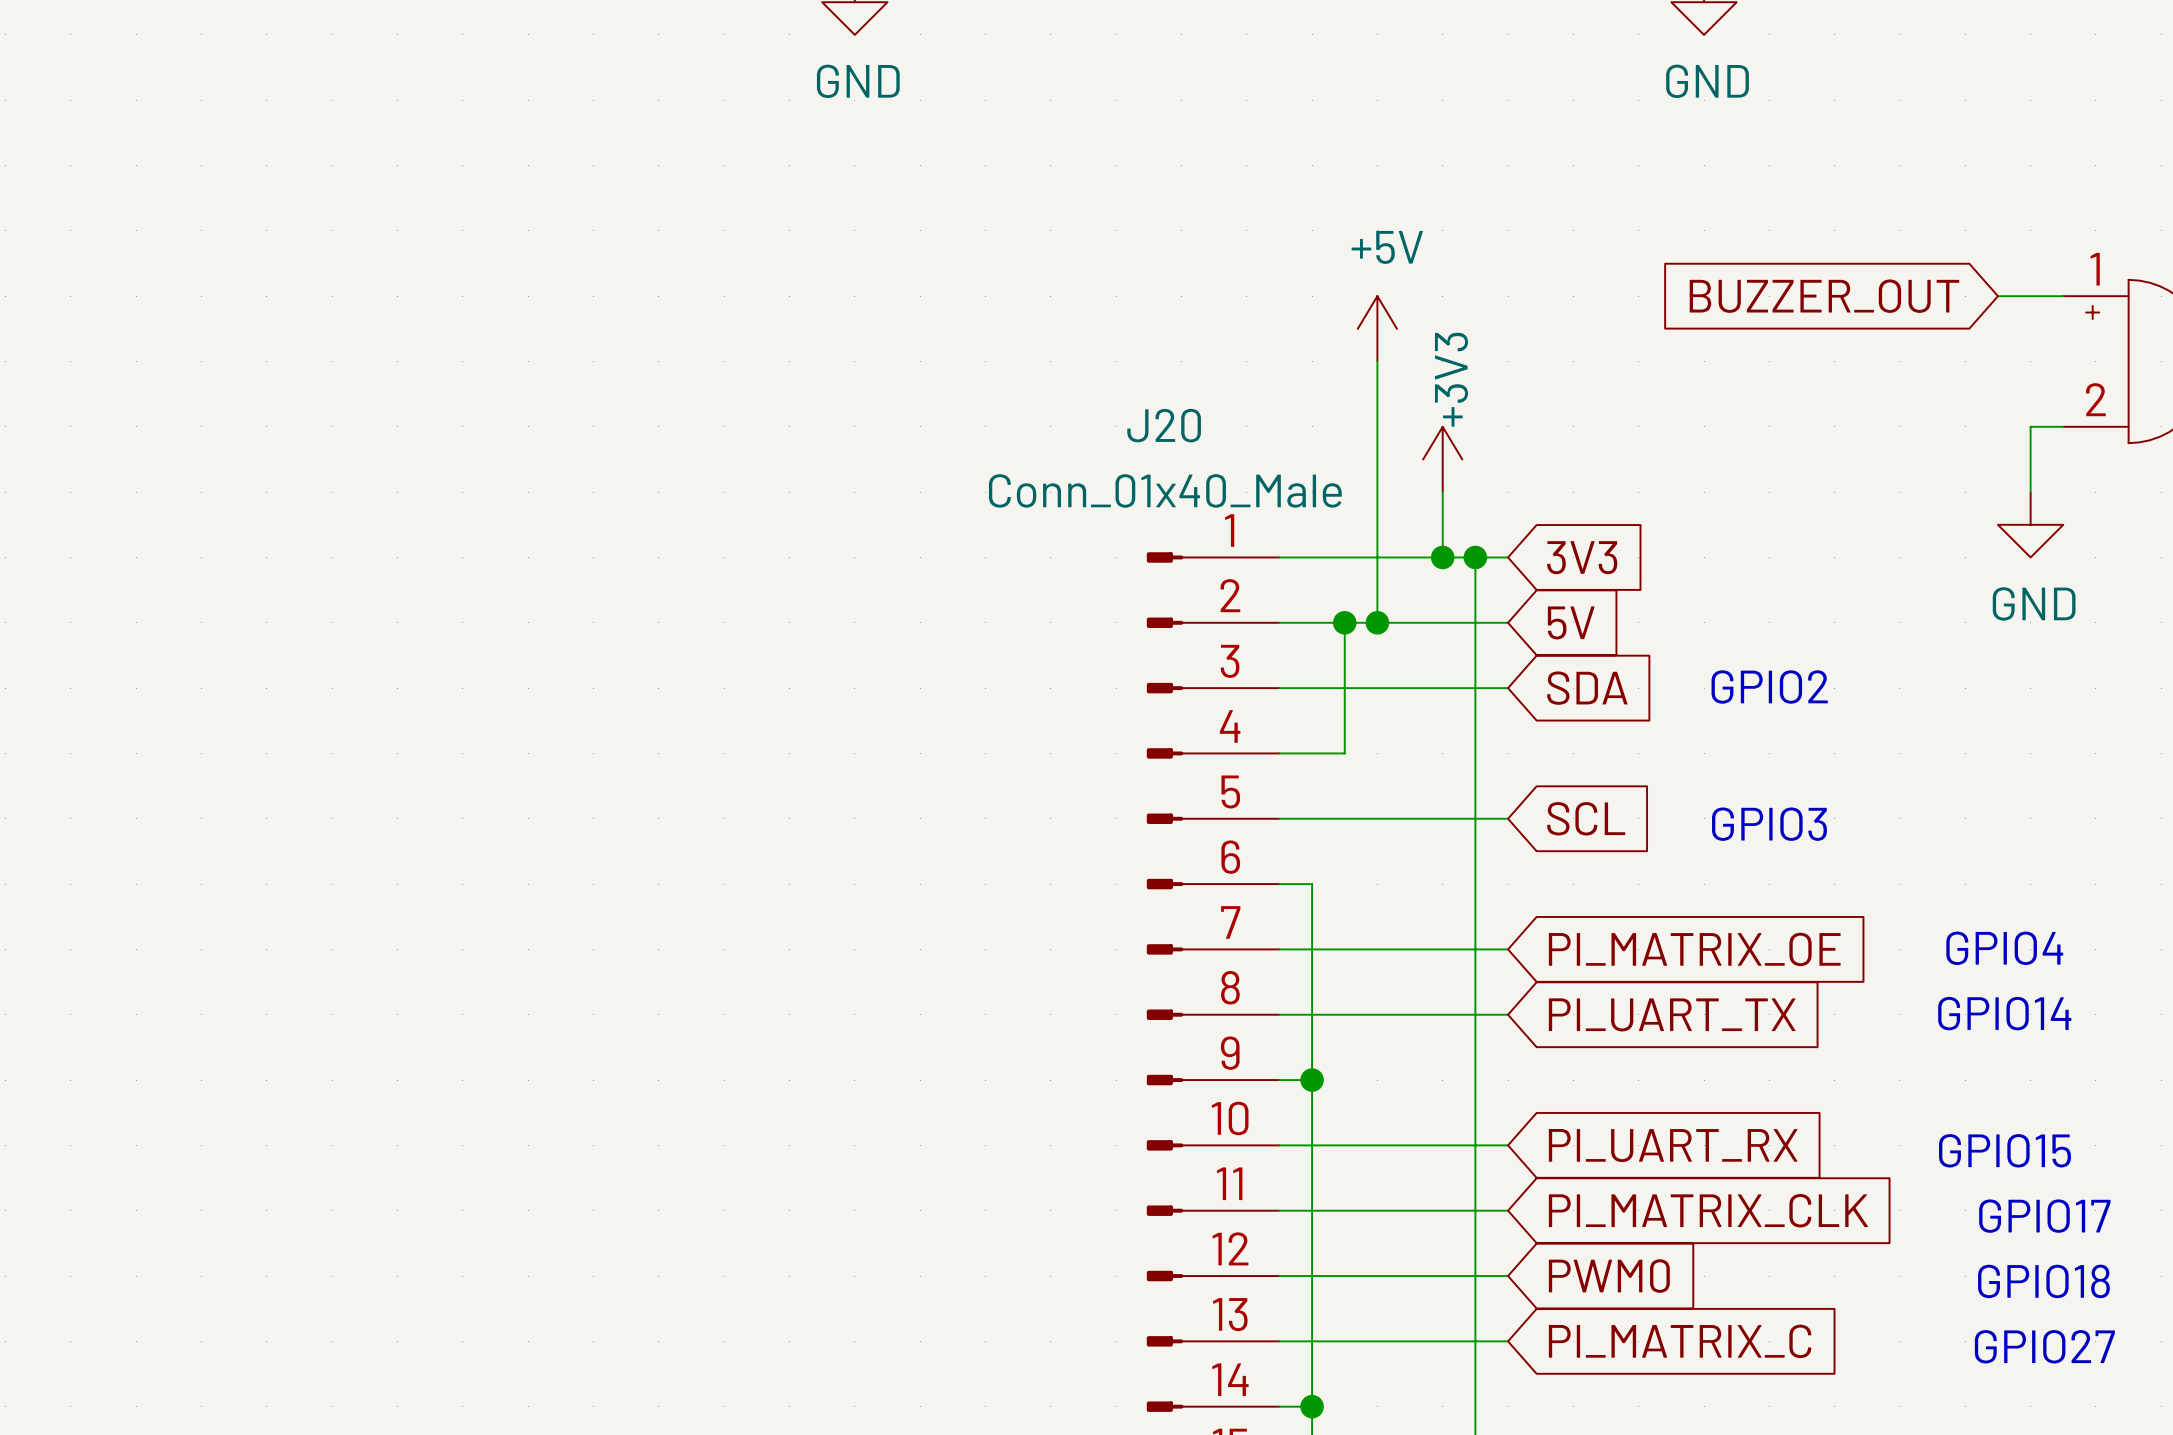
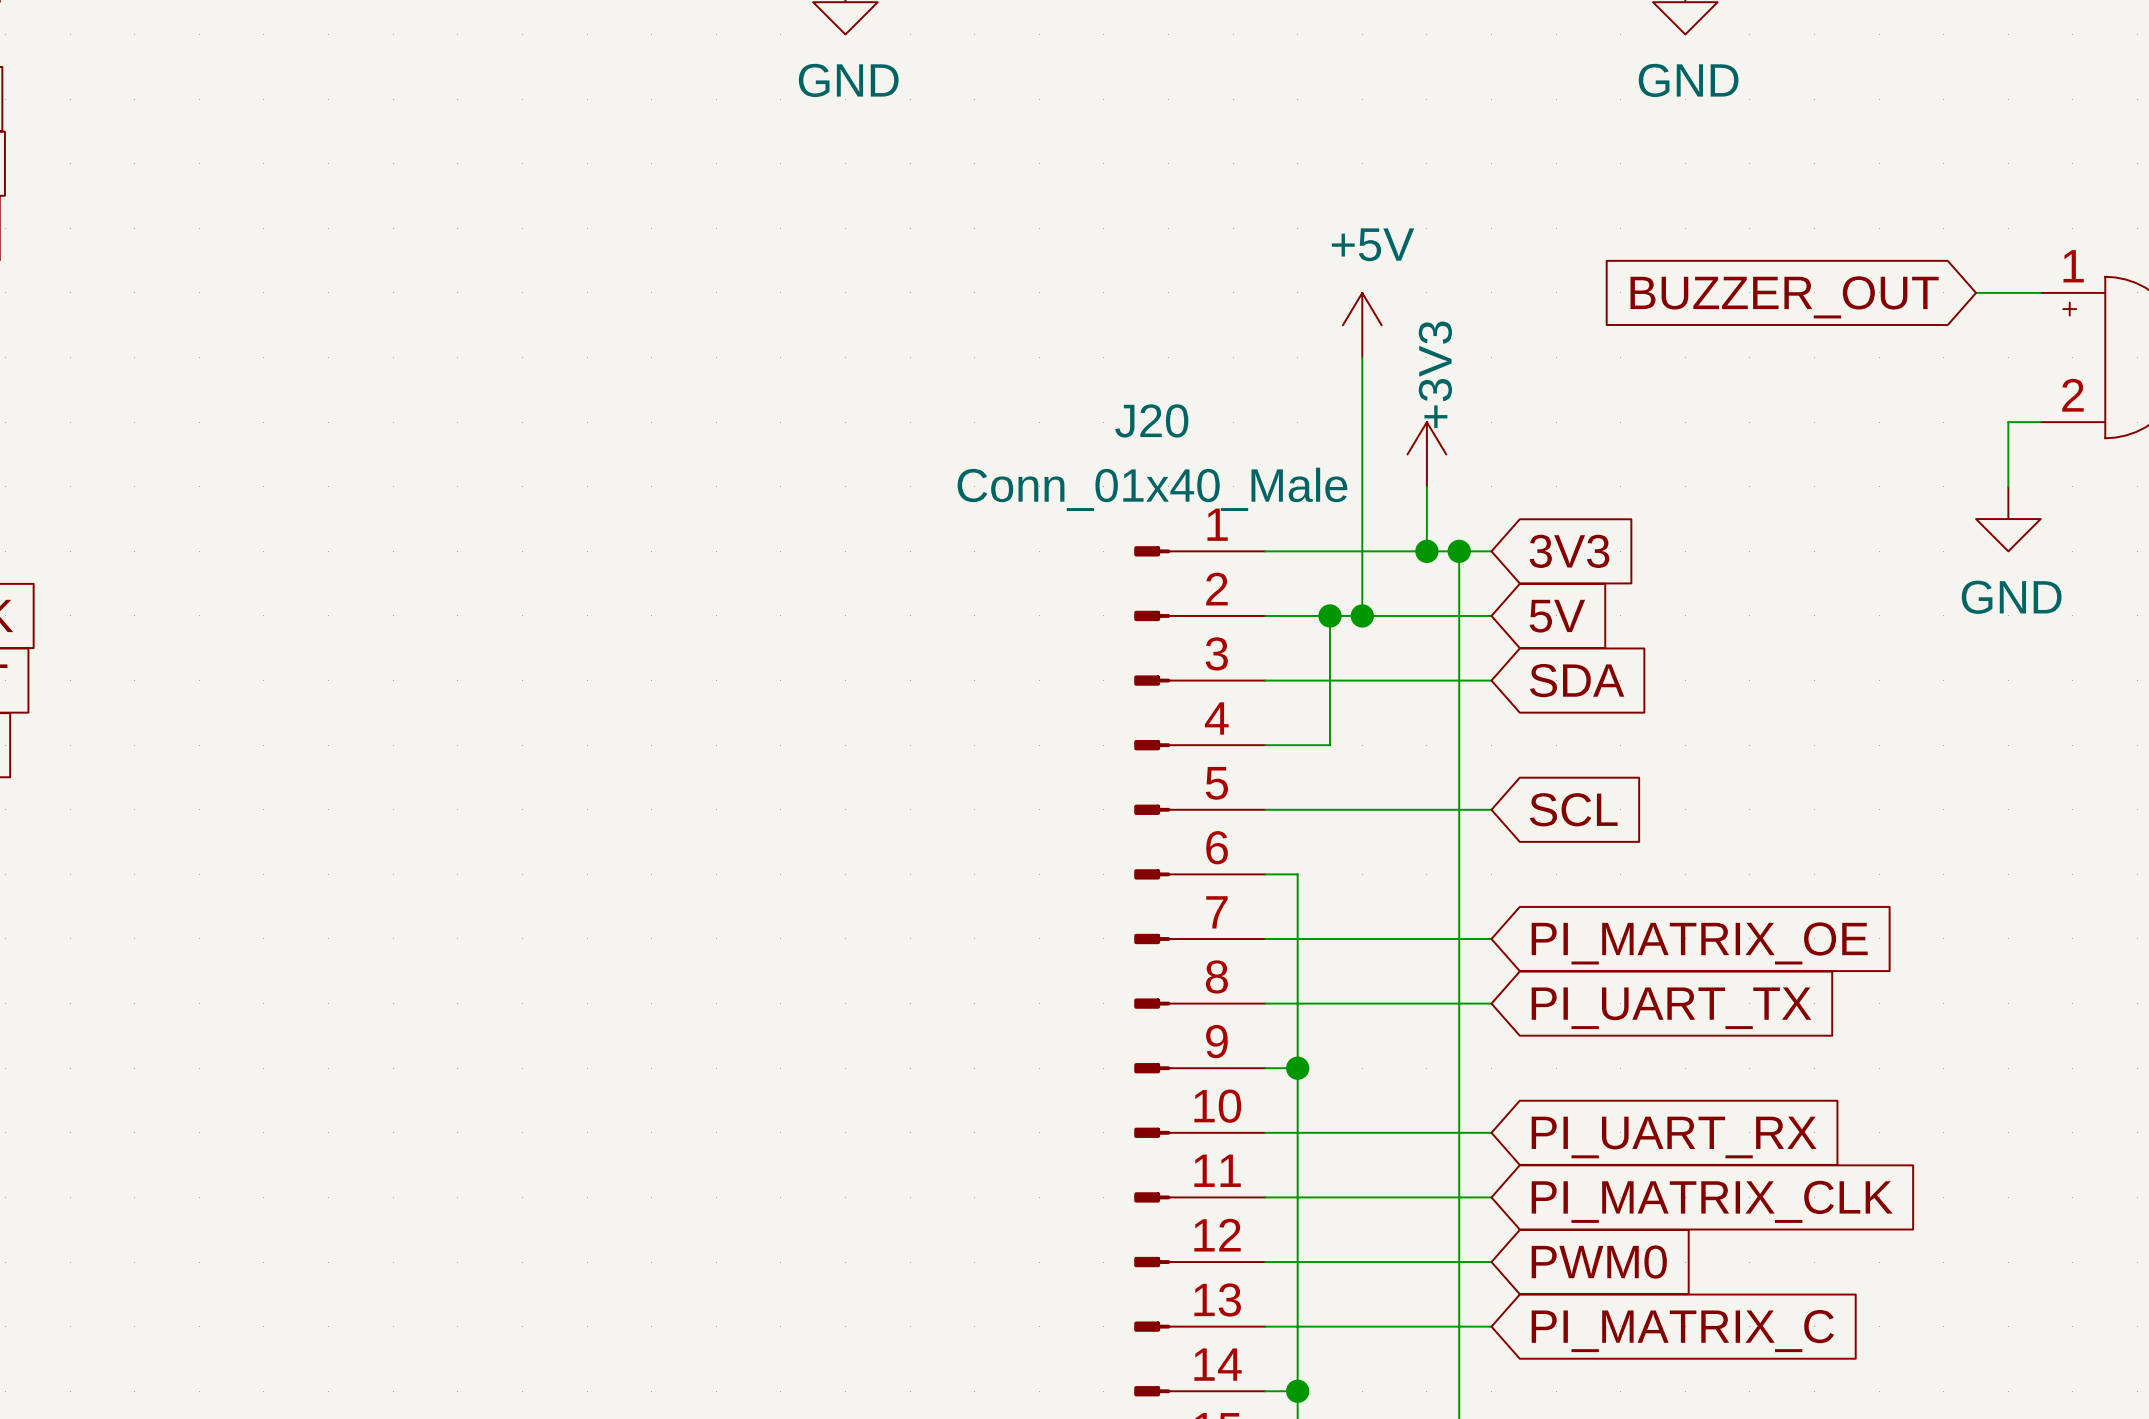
text: GPIO2 (1769, 687) -> none
text: GPIO3 (1769, 824) -> none
text: GPIO4 (2004, 948) -> none
text: GPIO14 (2004, 1013) -> none
text: GPIO15 (2005, 1150) -> none
text: GPIO17 (2044, 1216) -> none
text: GPIO18 (2043, 1281) -> none
text: GPIO27 (2044, 1346) -> none

